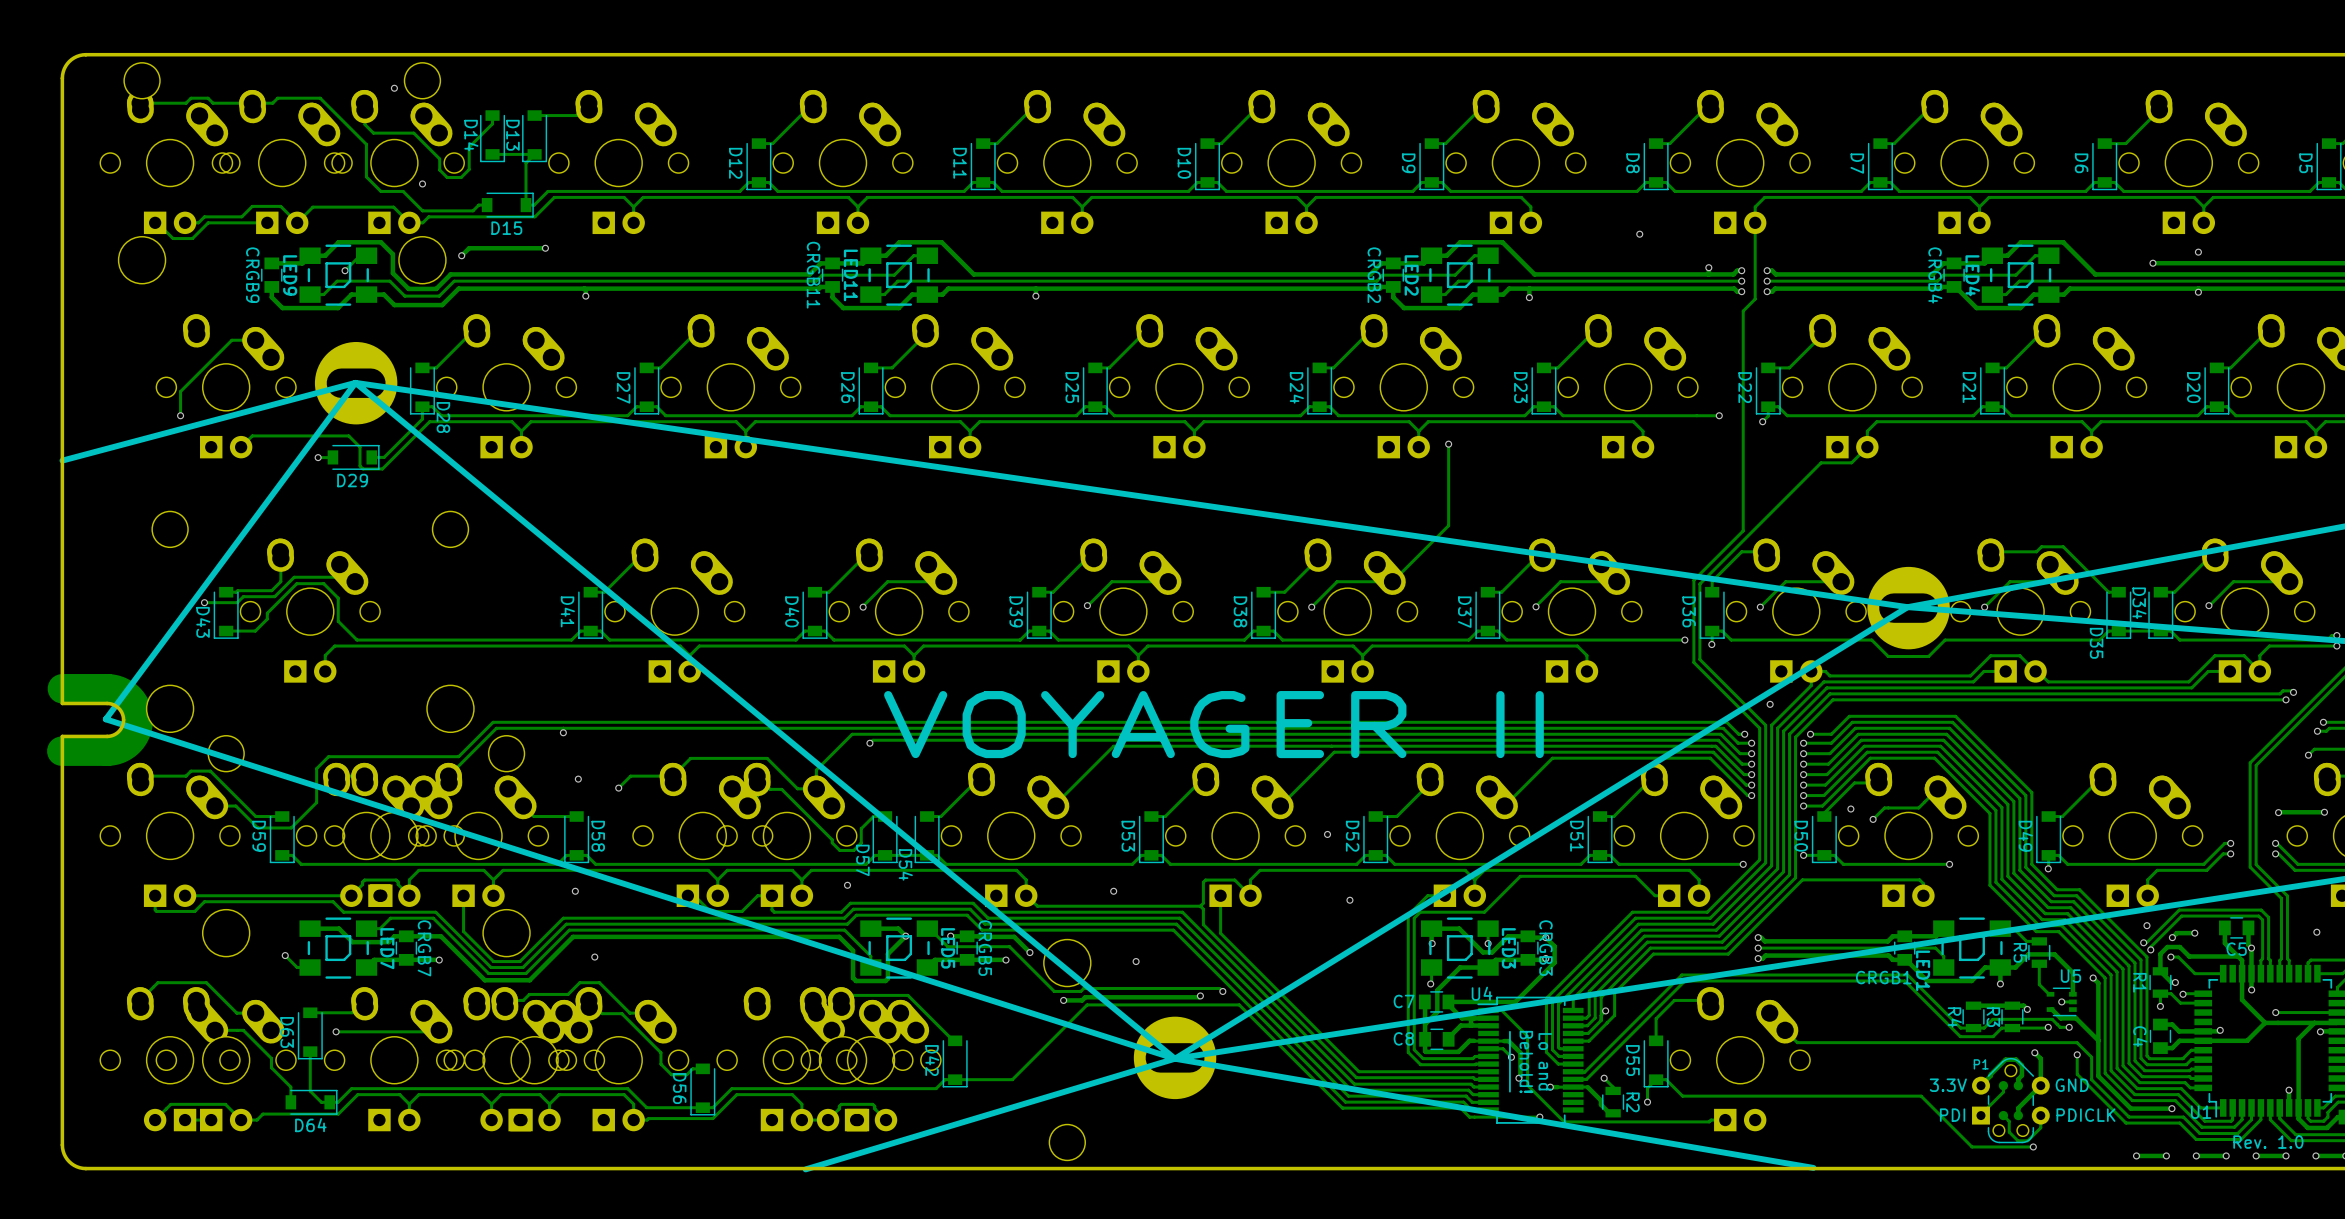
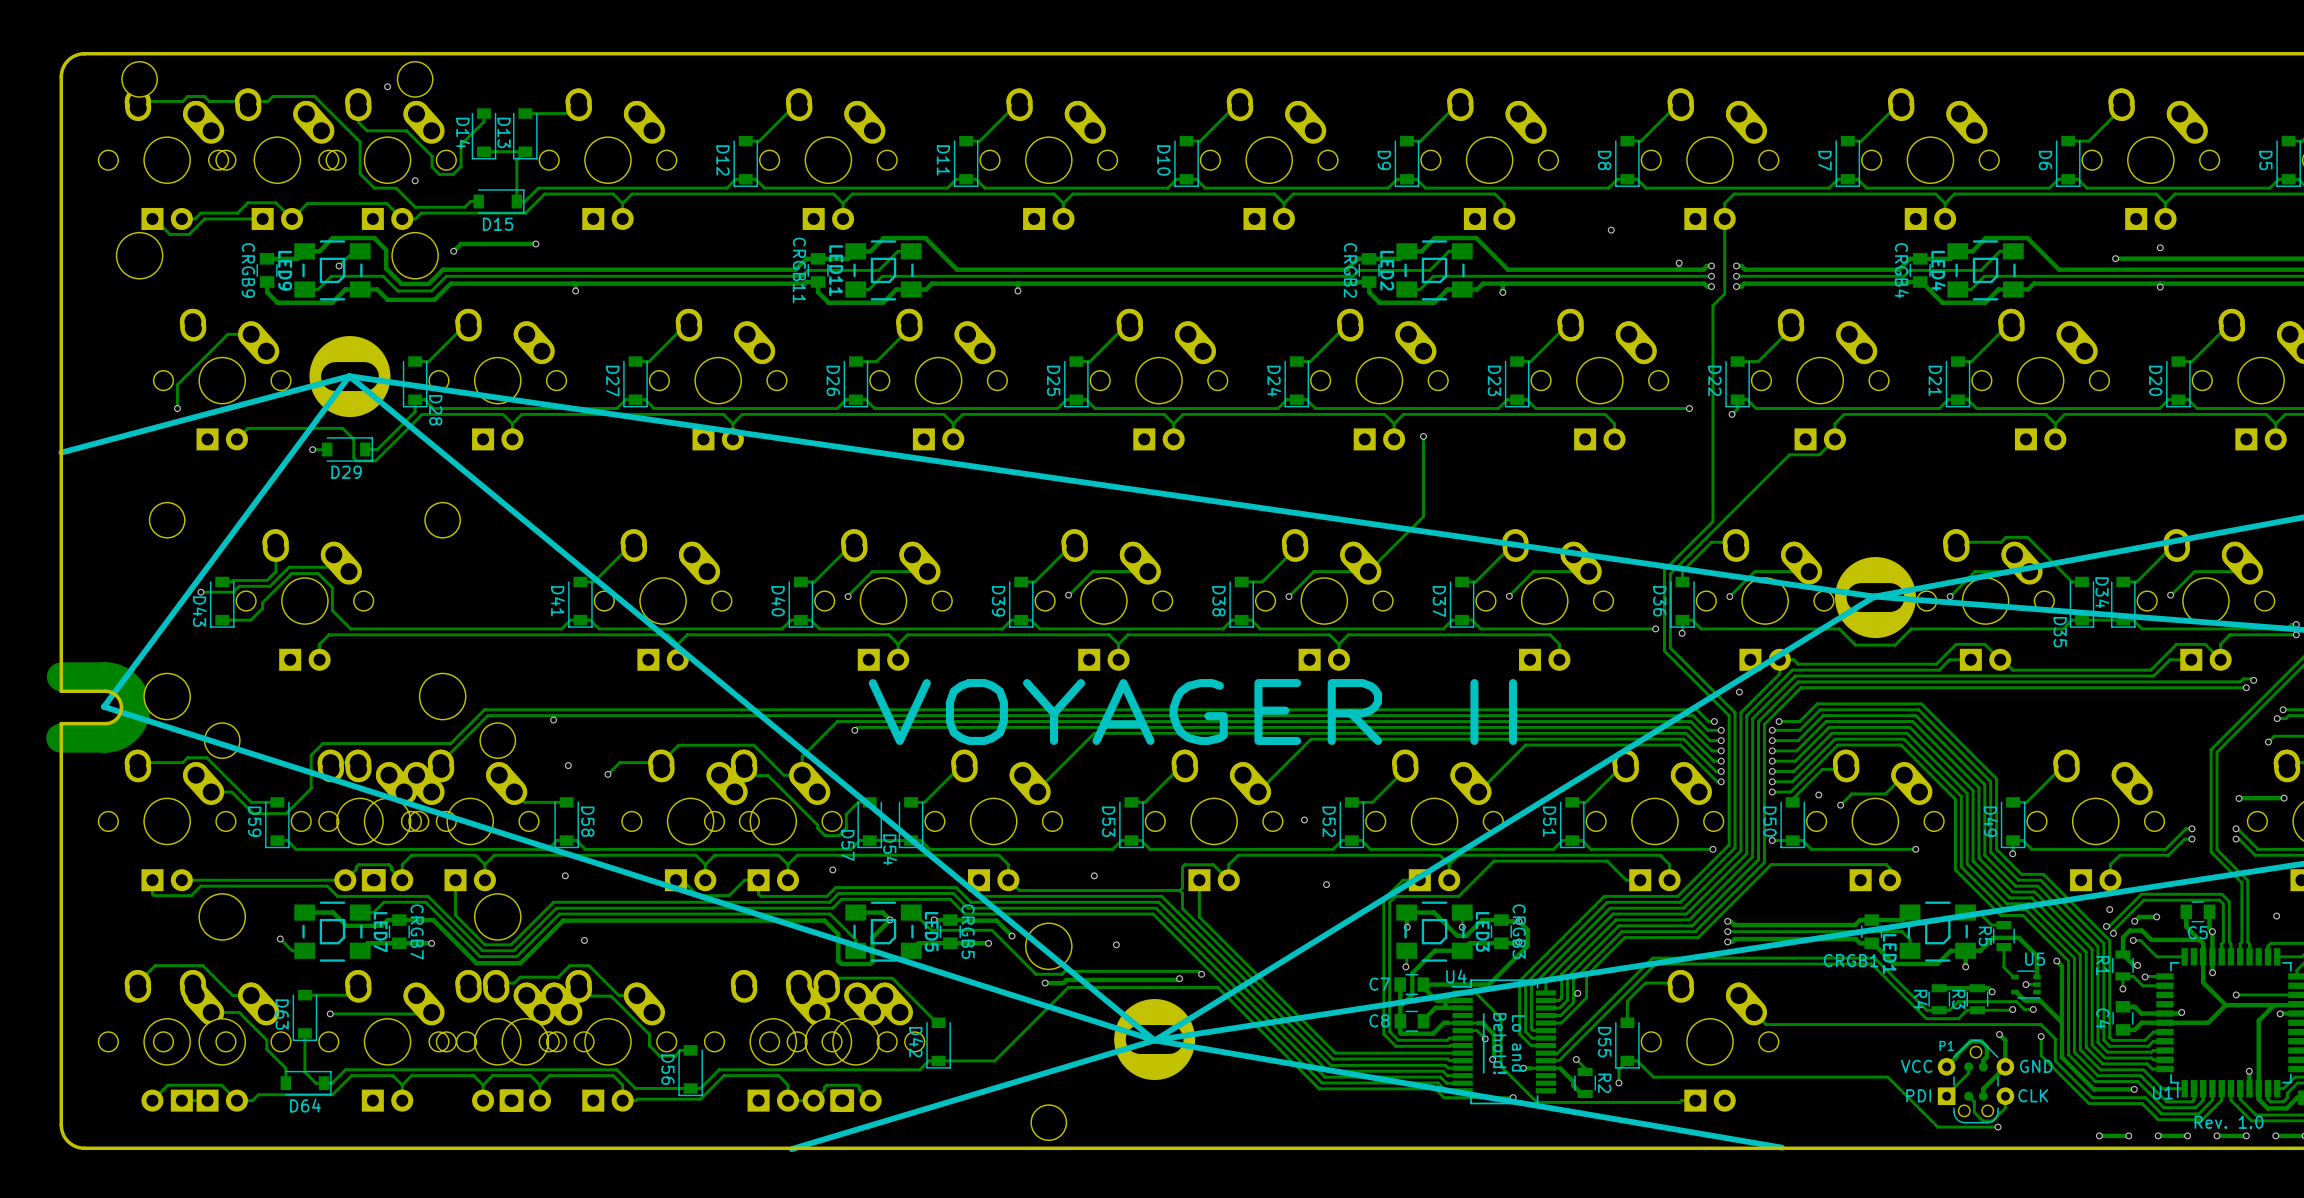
text: 3.3V (1948, 1085) -> VCC (1916, 1066)
text: PDICLK (2085, 1115) -> CLK (2033, 1095)

